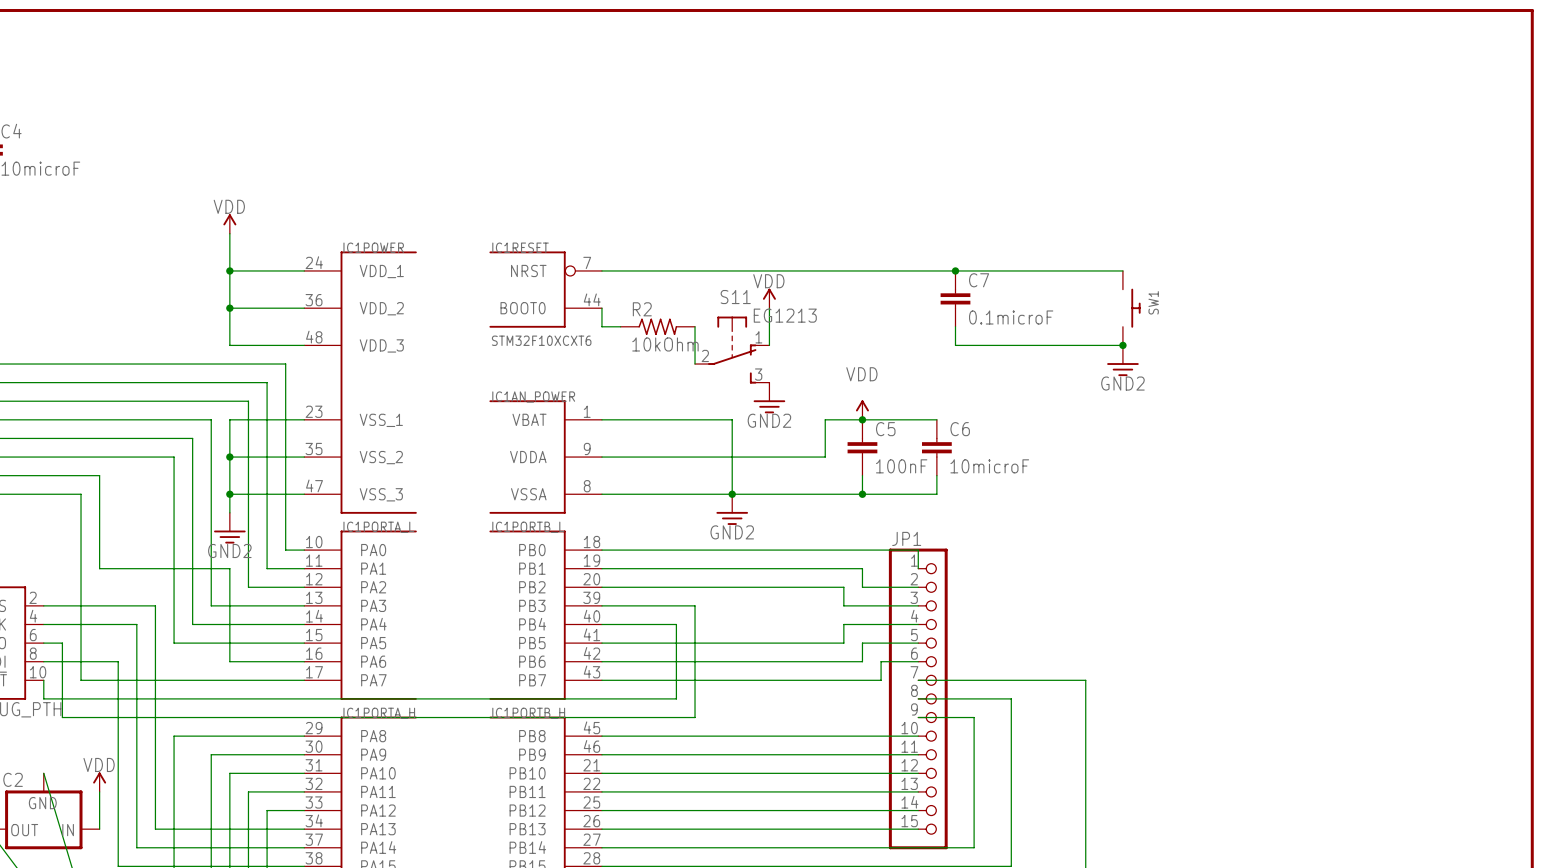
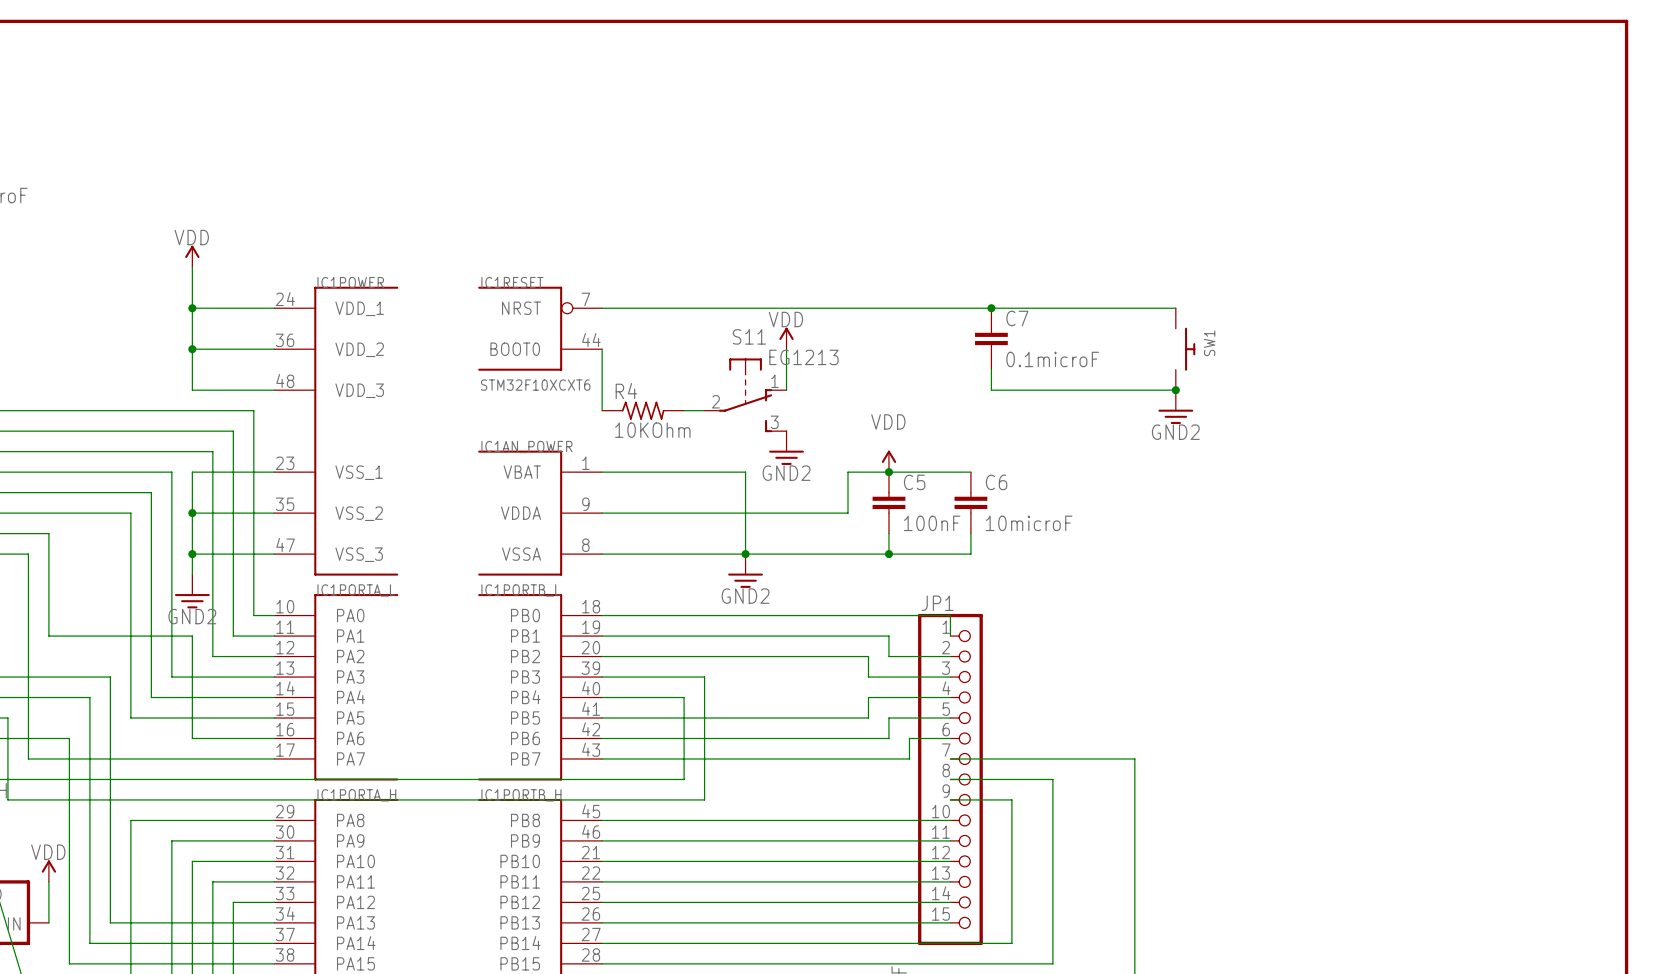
wire: (601, 326) (620, 326) -> (602, 369) (602, 410)
R2: 10kOhm (657, 326) -> none
wire: (695, 326) (695, 364) -> (684, 410) (704, 410)
R4: none -> 10KOhm (643, 410)

